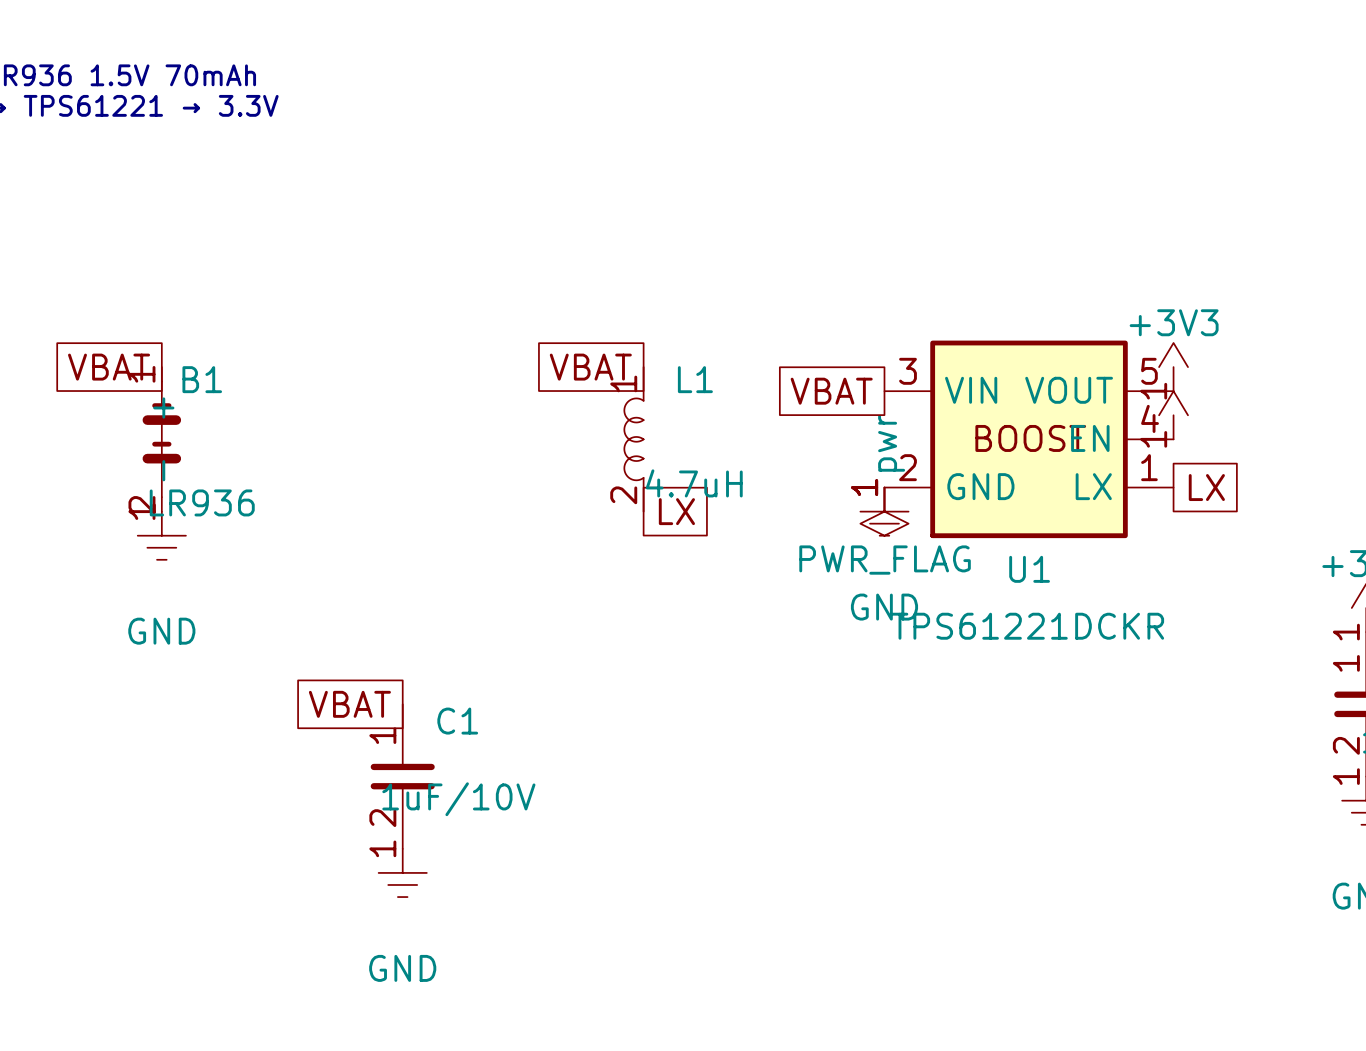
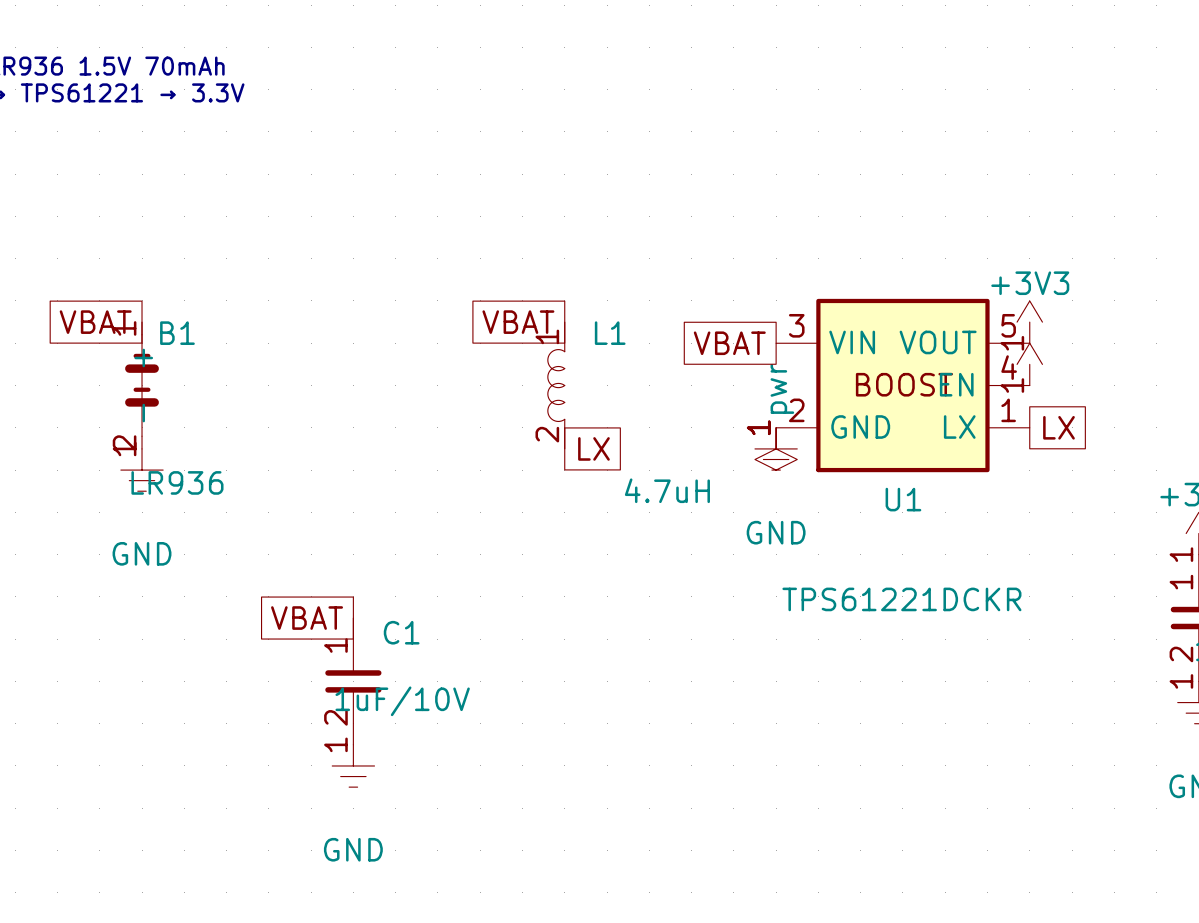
L1 value position: 4.7uH (694, 483) -> 4.7uH (667, 490)
B1 value position: LR936 (202, 502) -> LR936 (177, 482)
power symbol text: PWR_FLAG (885, 560) -> none
U1 value position: TPS61221DCKR (1027, 626) -> TPS61221DCKR (901, 599)

